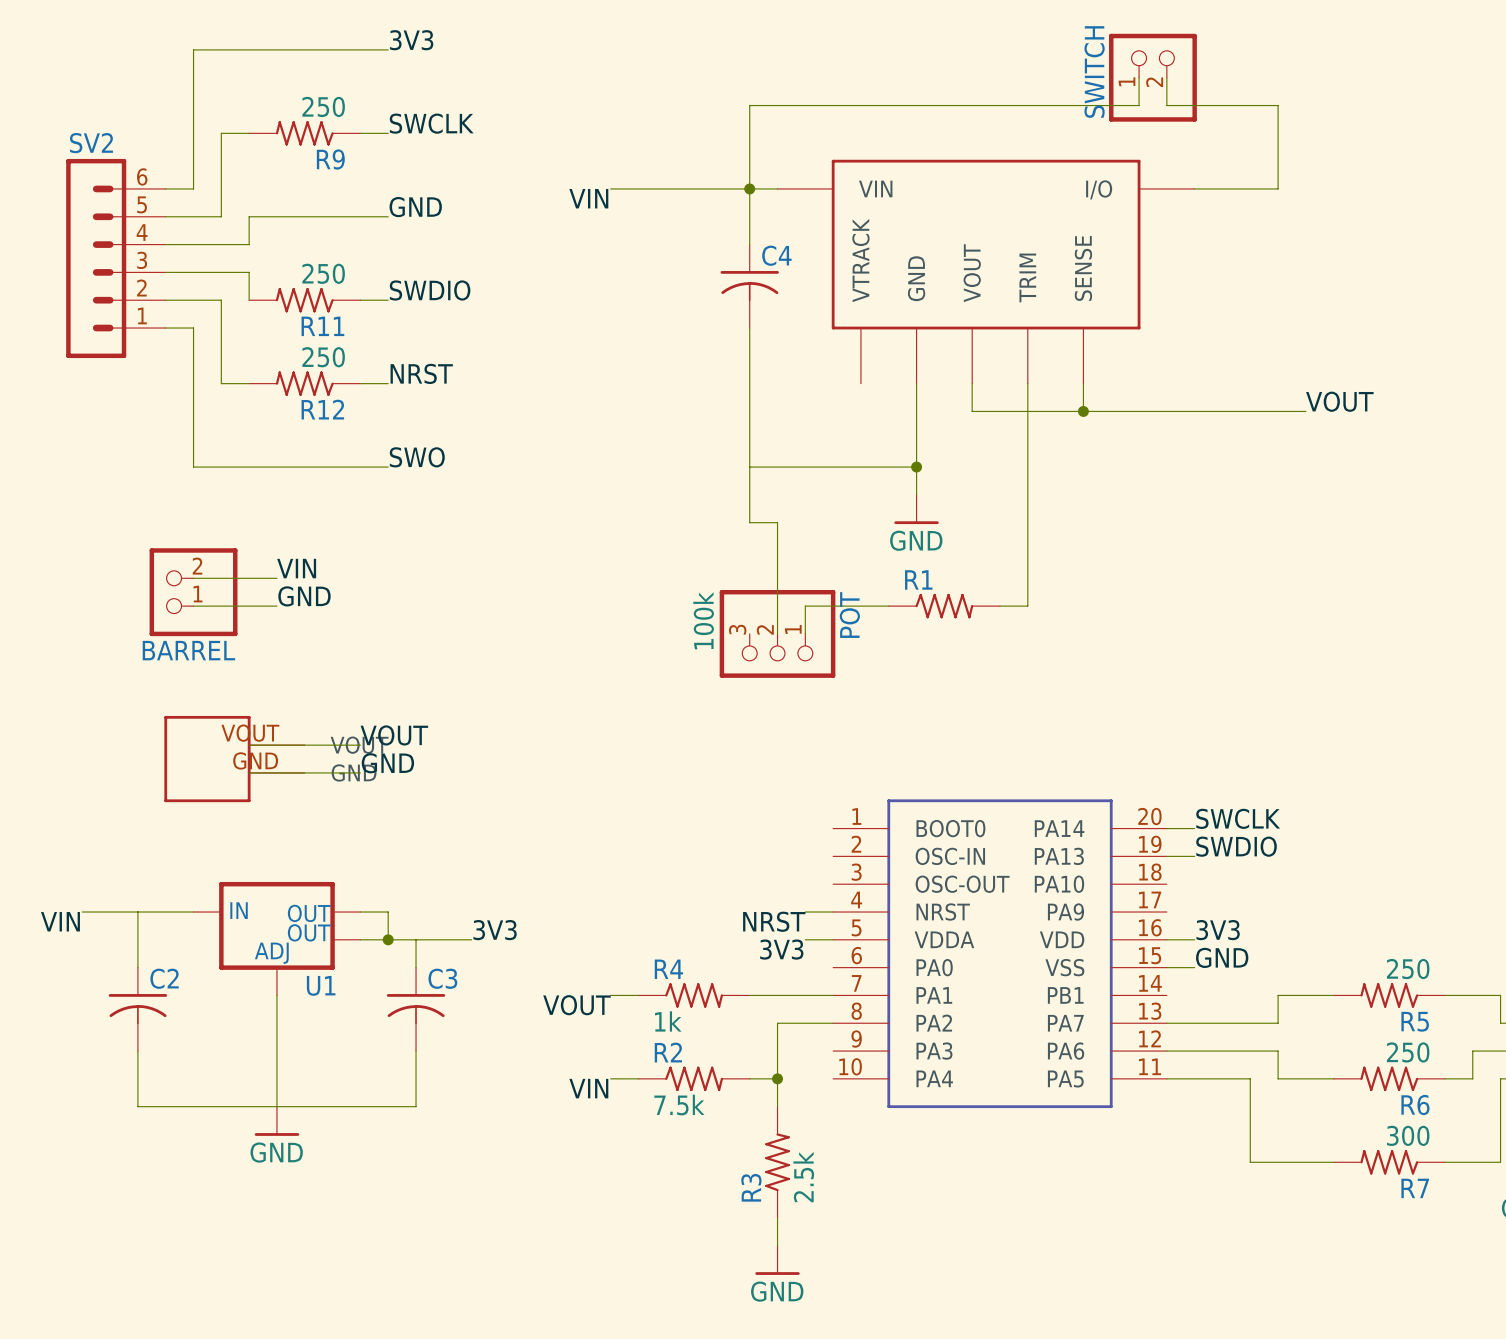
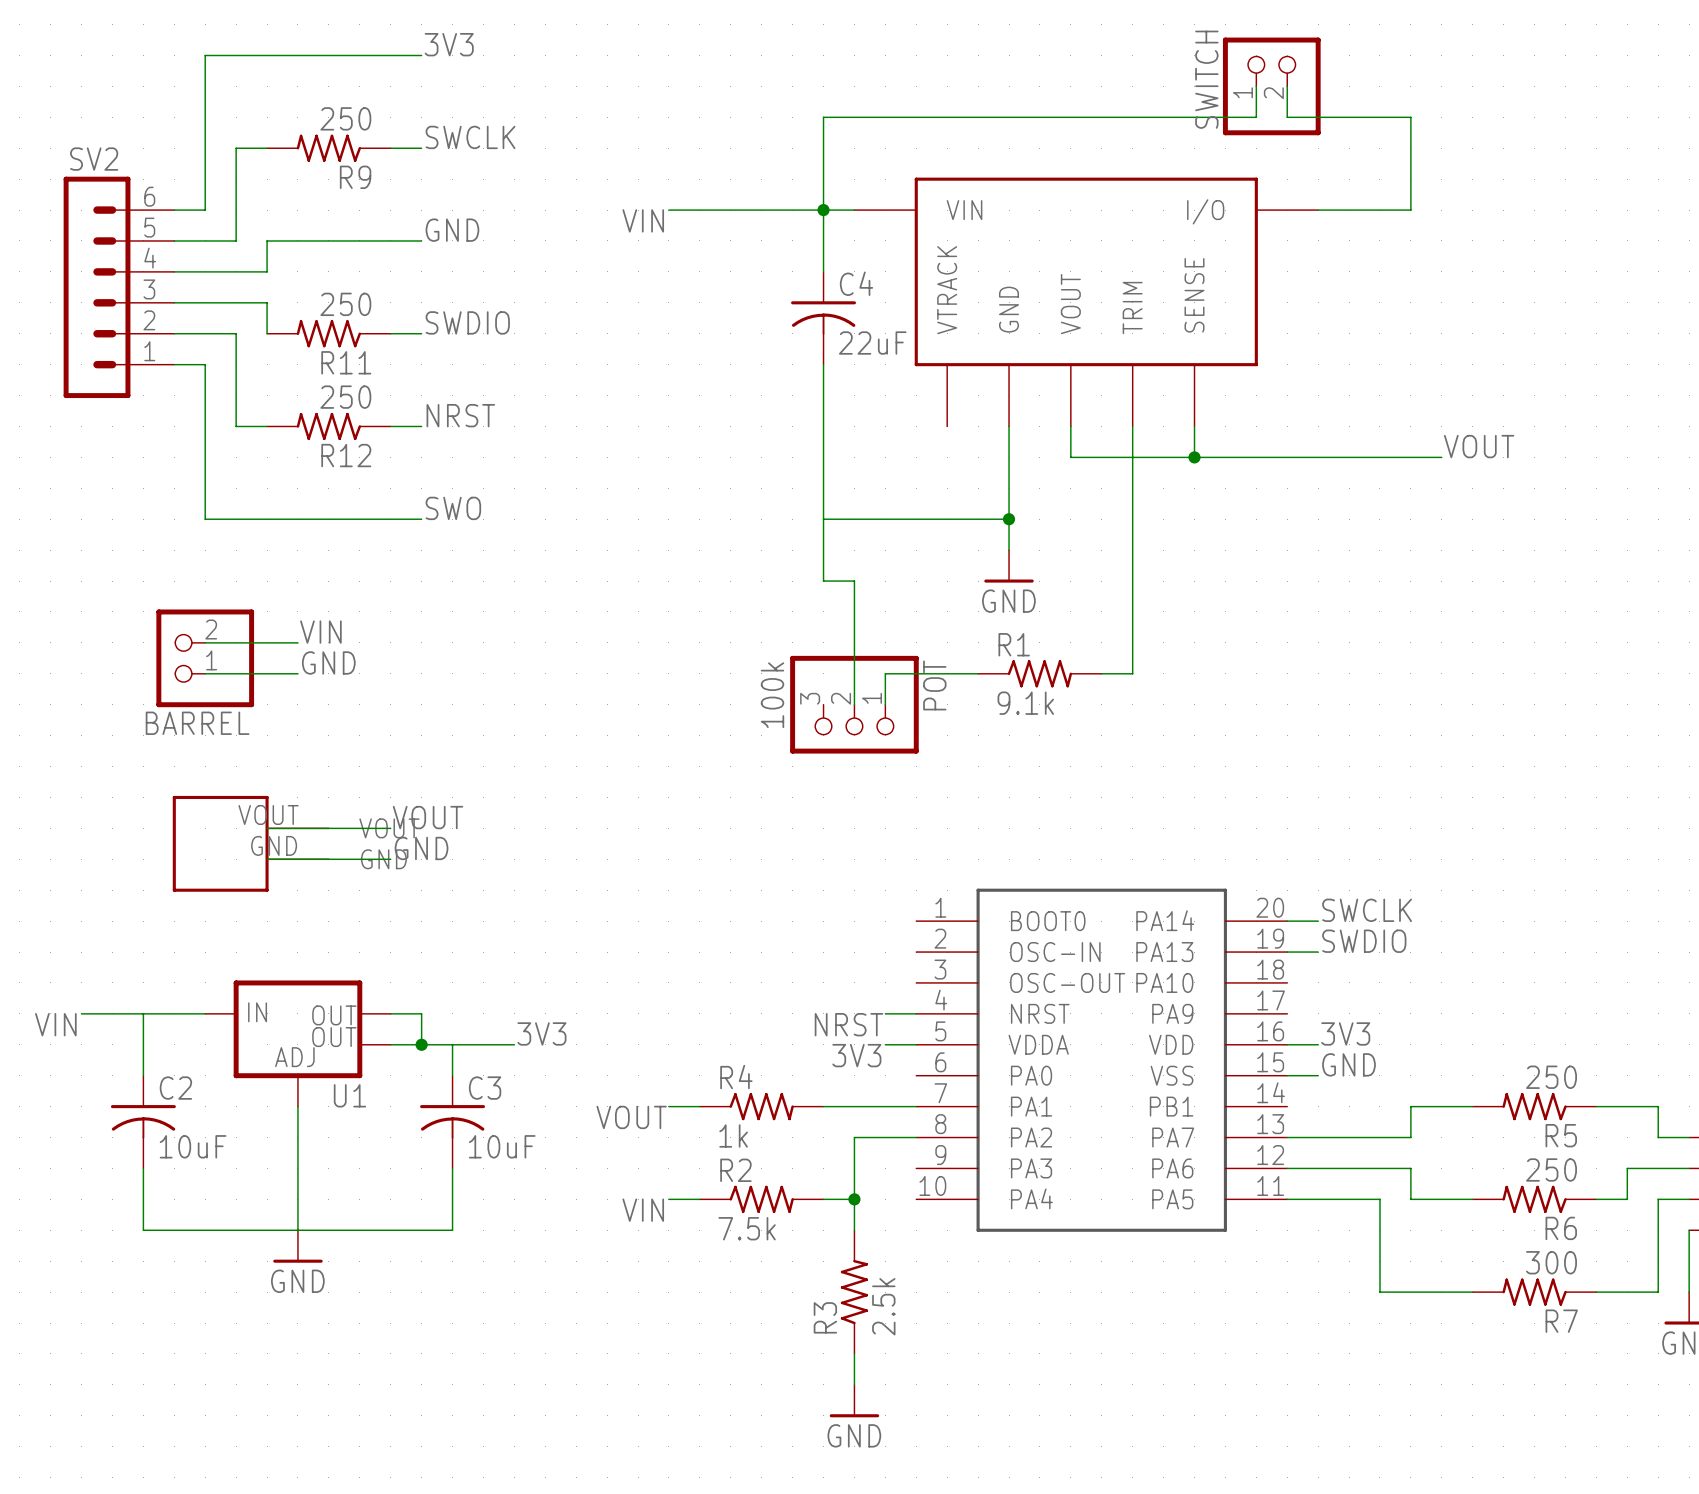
C4 value: none -> 22uF (872, 343)
R1 value: none -> 9.1k (1025, 703)
C2 value: none -> 10uF (193, 1146)
C3 value: none -> 10uF (502, 1146)

